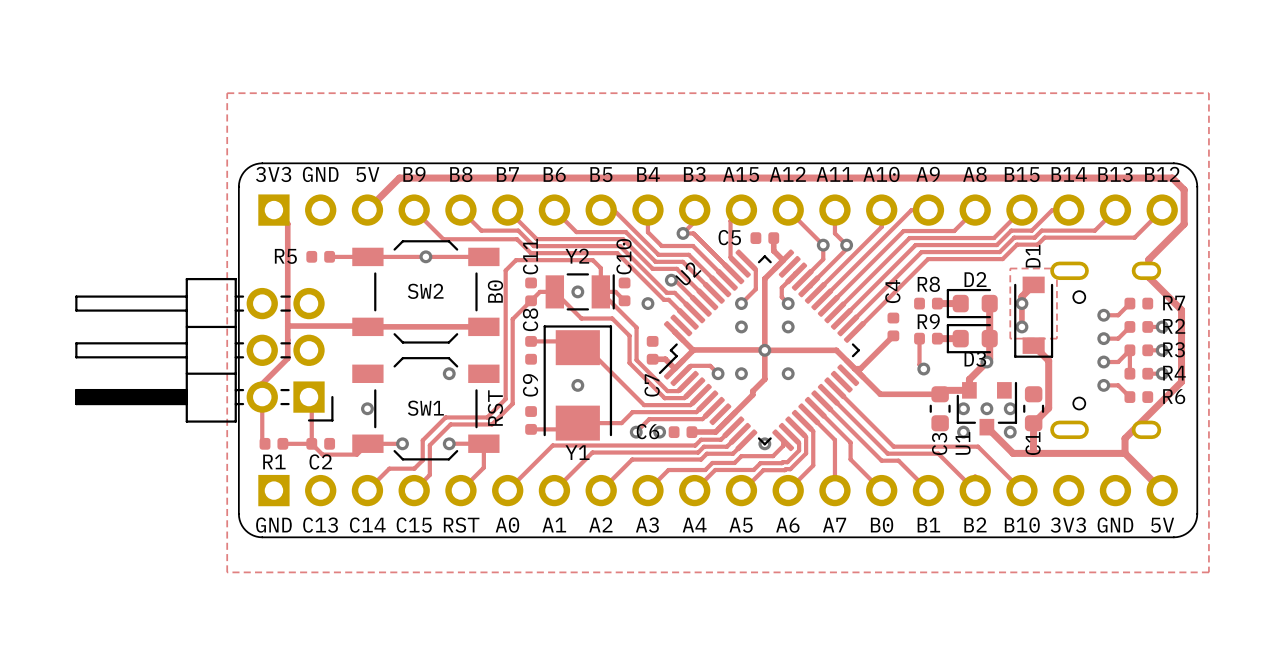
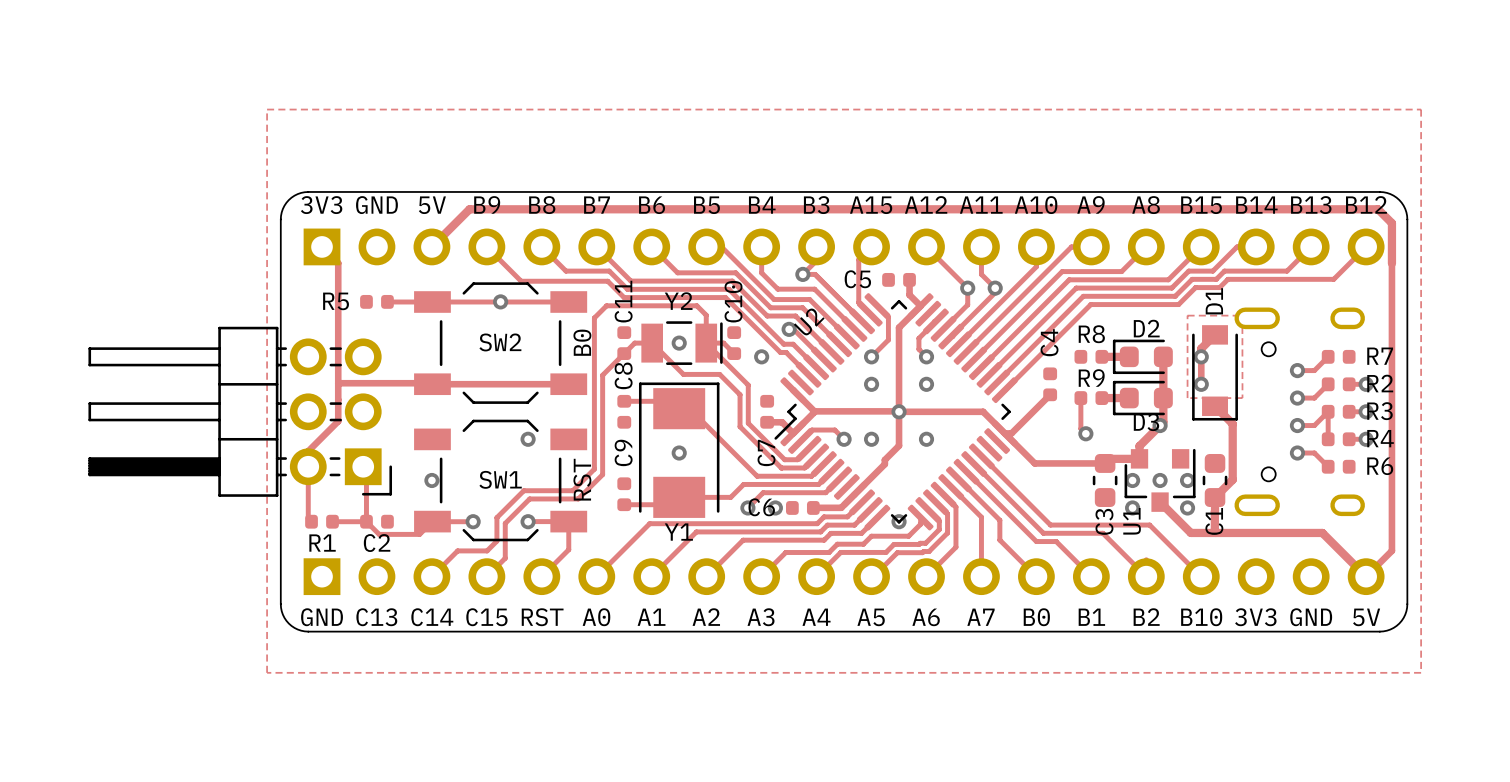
track: (1184, 224) (1148, 259) (1148, 277) (1181, 309) (1181, 381) (1125, 438) (1125, 453) -> (1391, 263) (1391, 550) (1366, 576)

